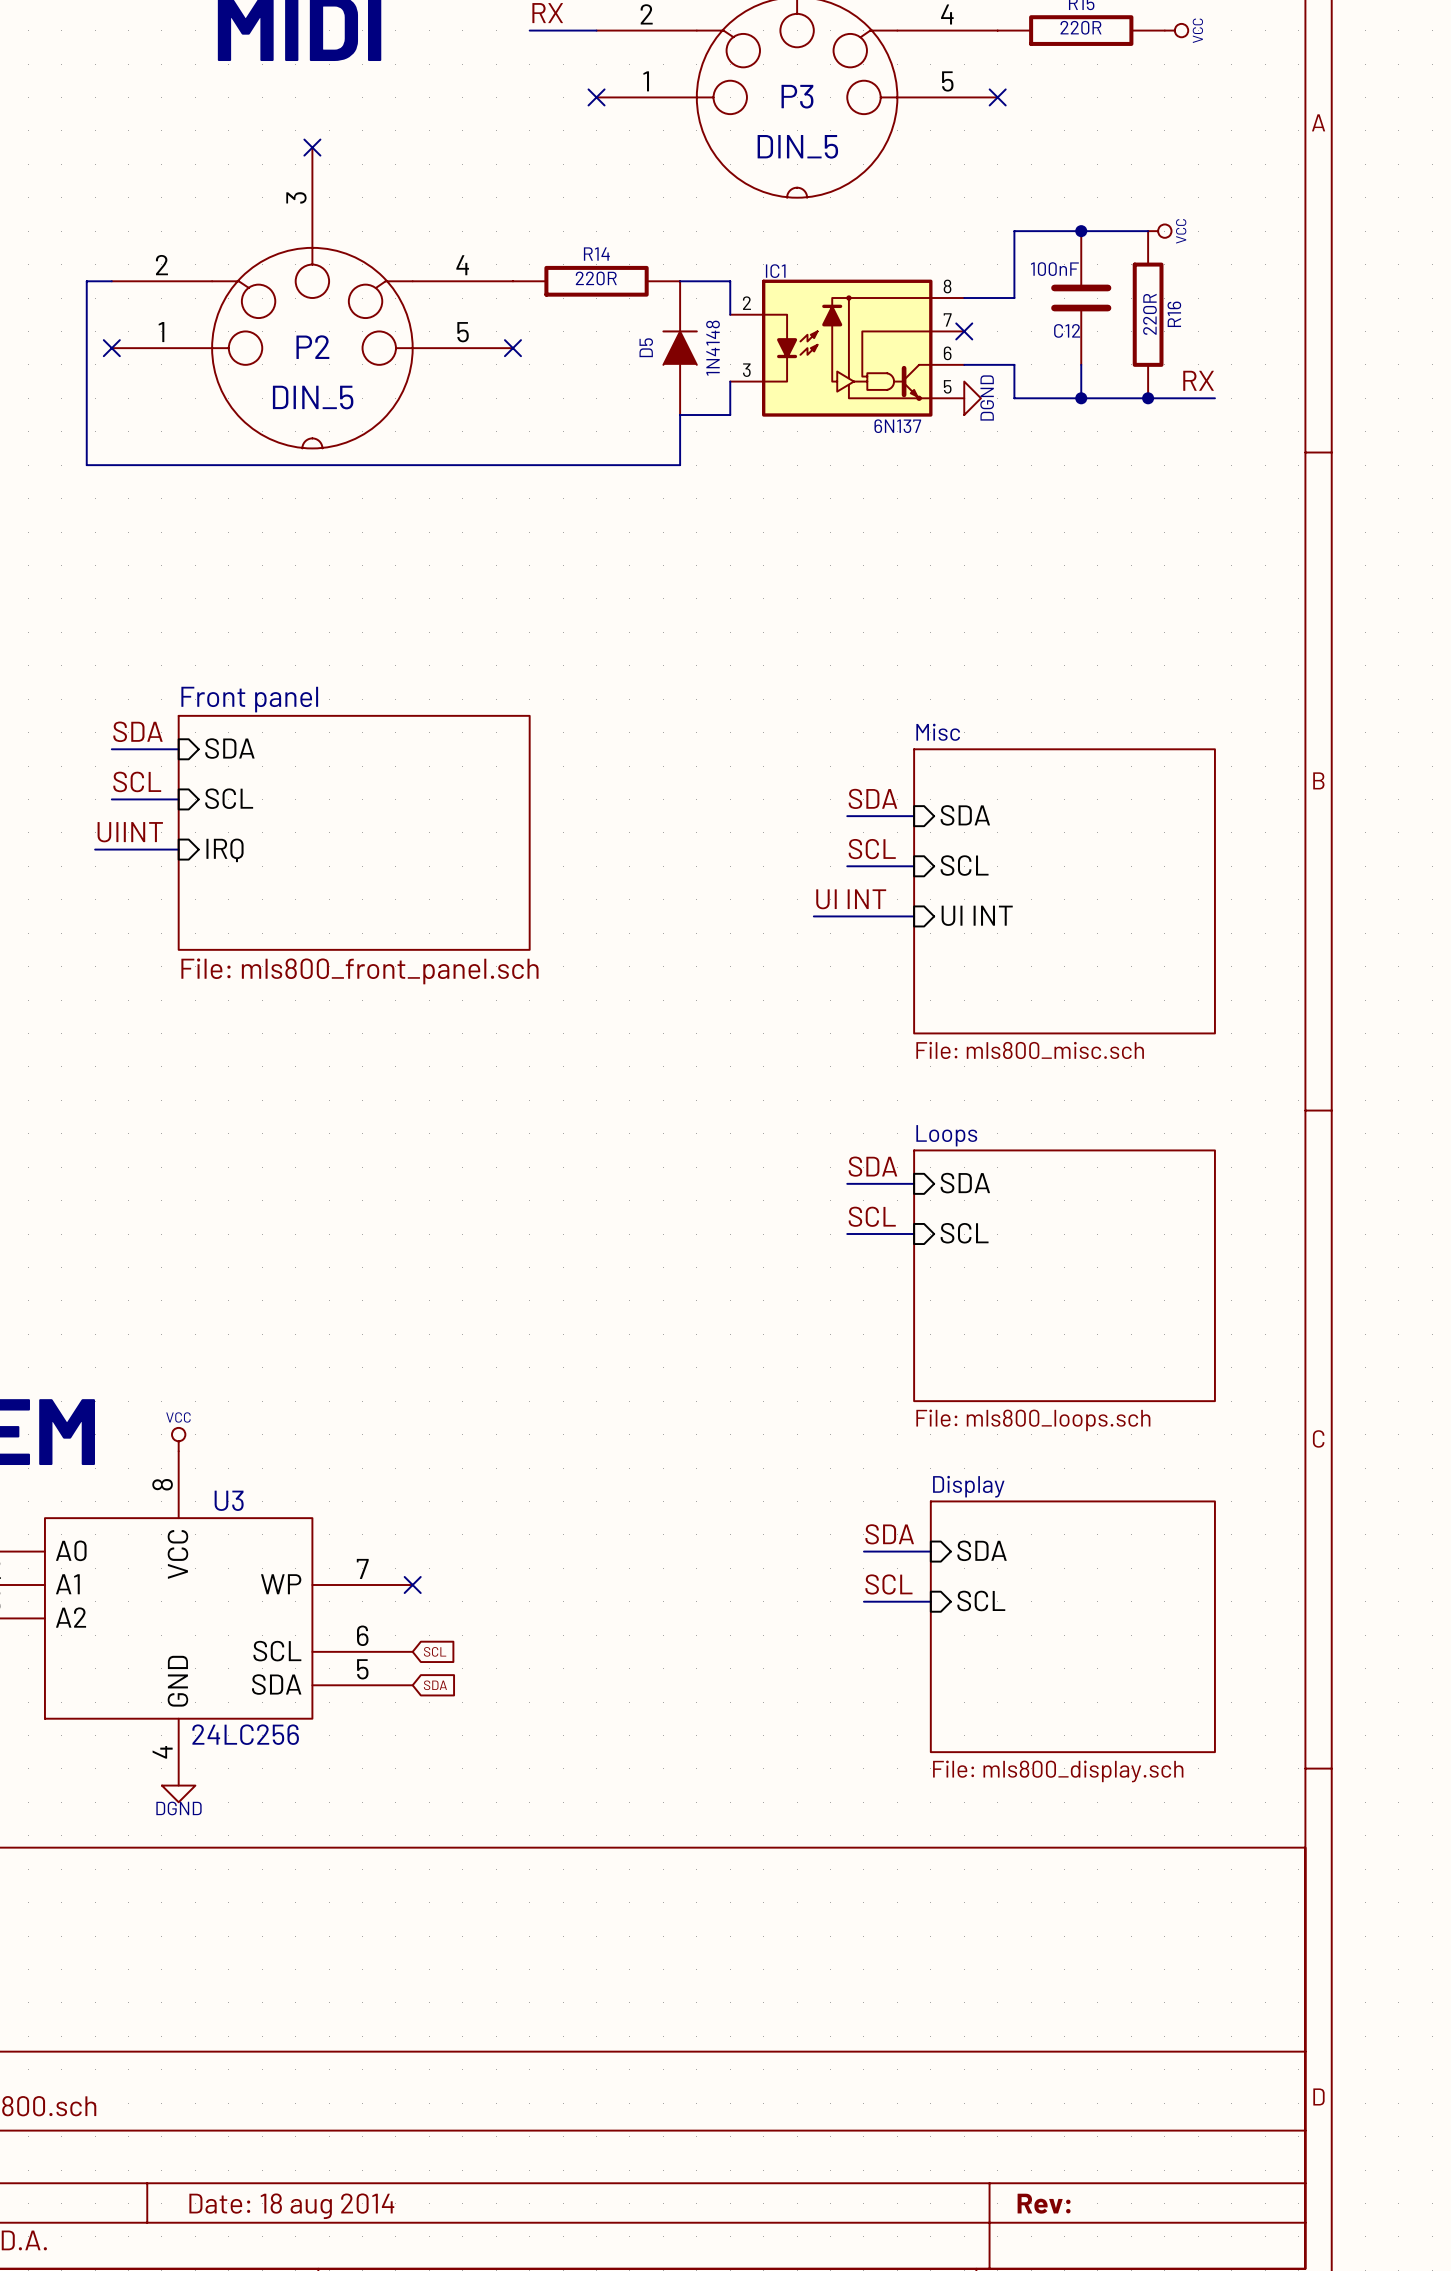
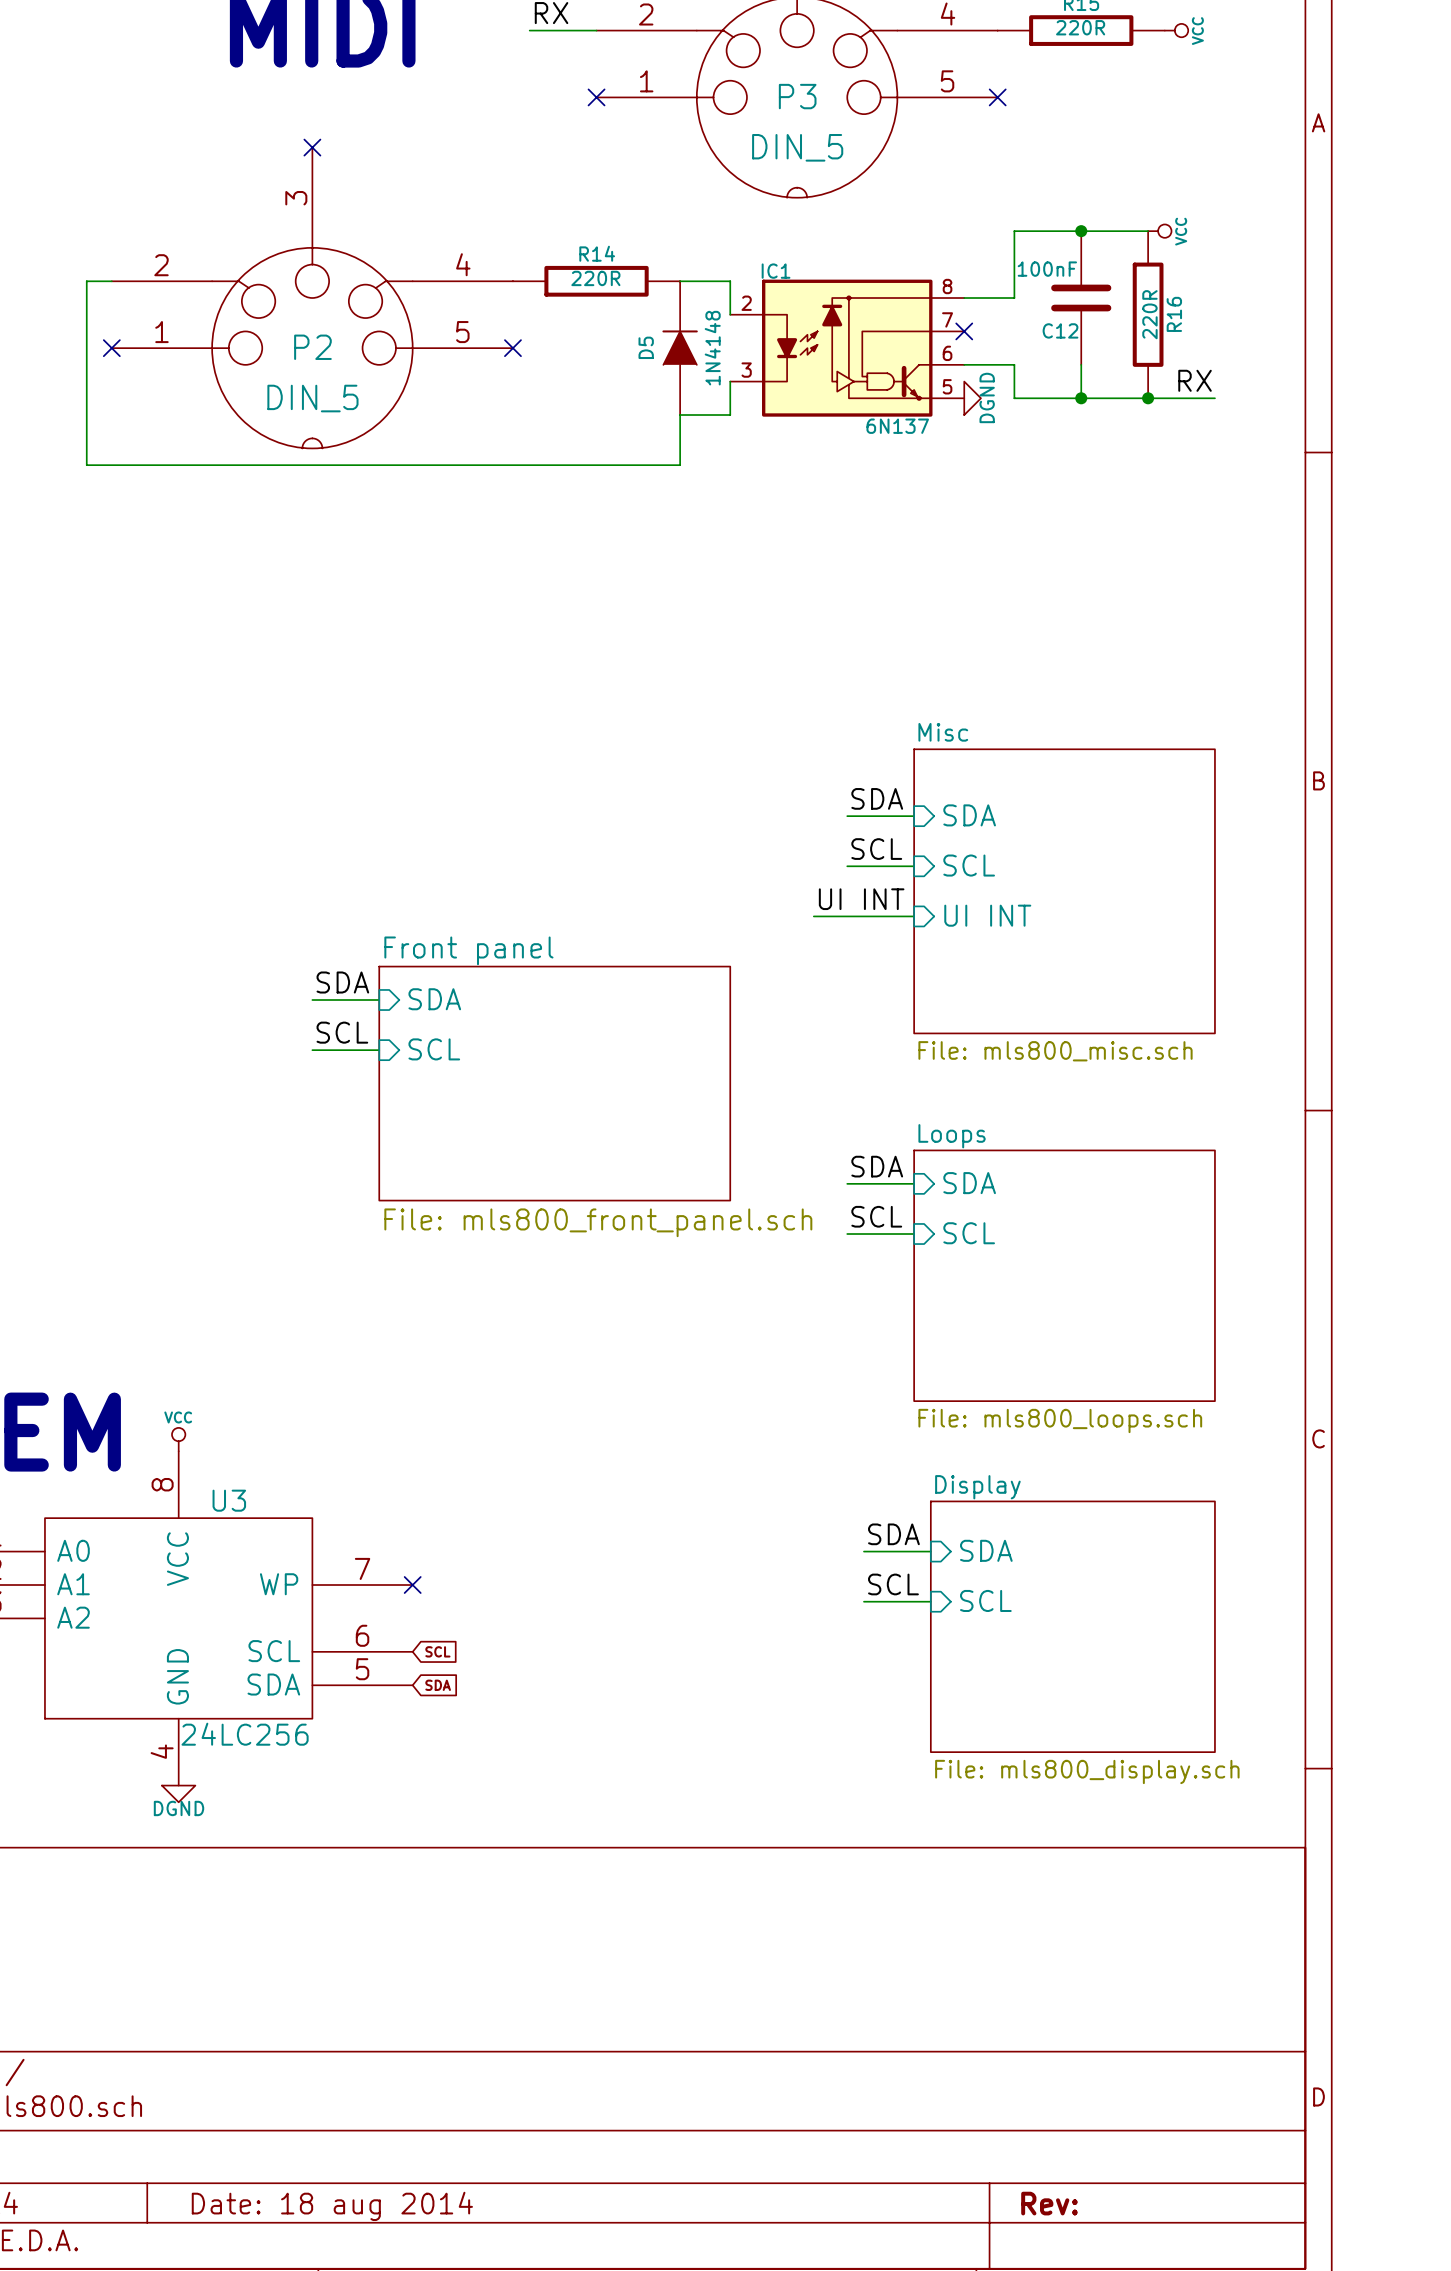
label position: SDA (137, 731) -> SDA (342, 982)
sheet pin position: SDA (229, 748) -> SDA (434, 999)
wire: (111, 749) (178, 749) -> none
label position: SCL (137, 781) -> SCL (342, 1032)
sheet pin position: SCL (229, 798) -> SCL (434, 1049)
wire: (111, 799) (178, 799) -> (312, 1000) (379, 1000)
label: UIINT (130, 832) -> none
sheet Front panel position: (354, 832) -> (554, 1083)
wire: (95, 849) (178, 849) -> none
sheet pin: IRQ (225, 850) -> none
wire: none -> (312, 1050) (379, 1050)

